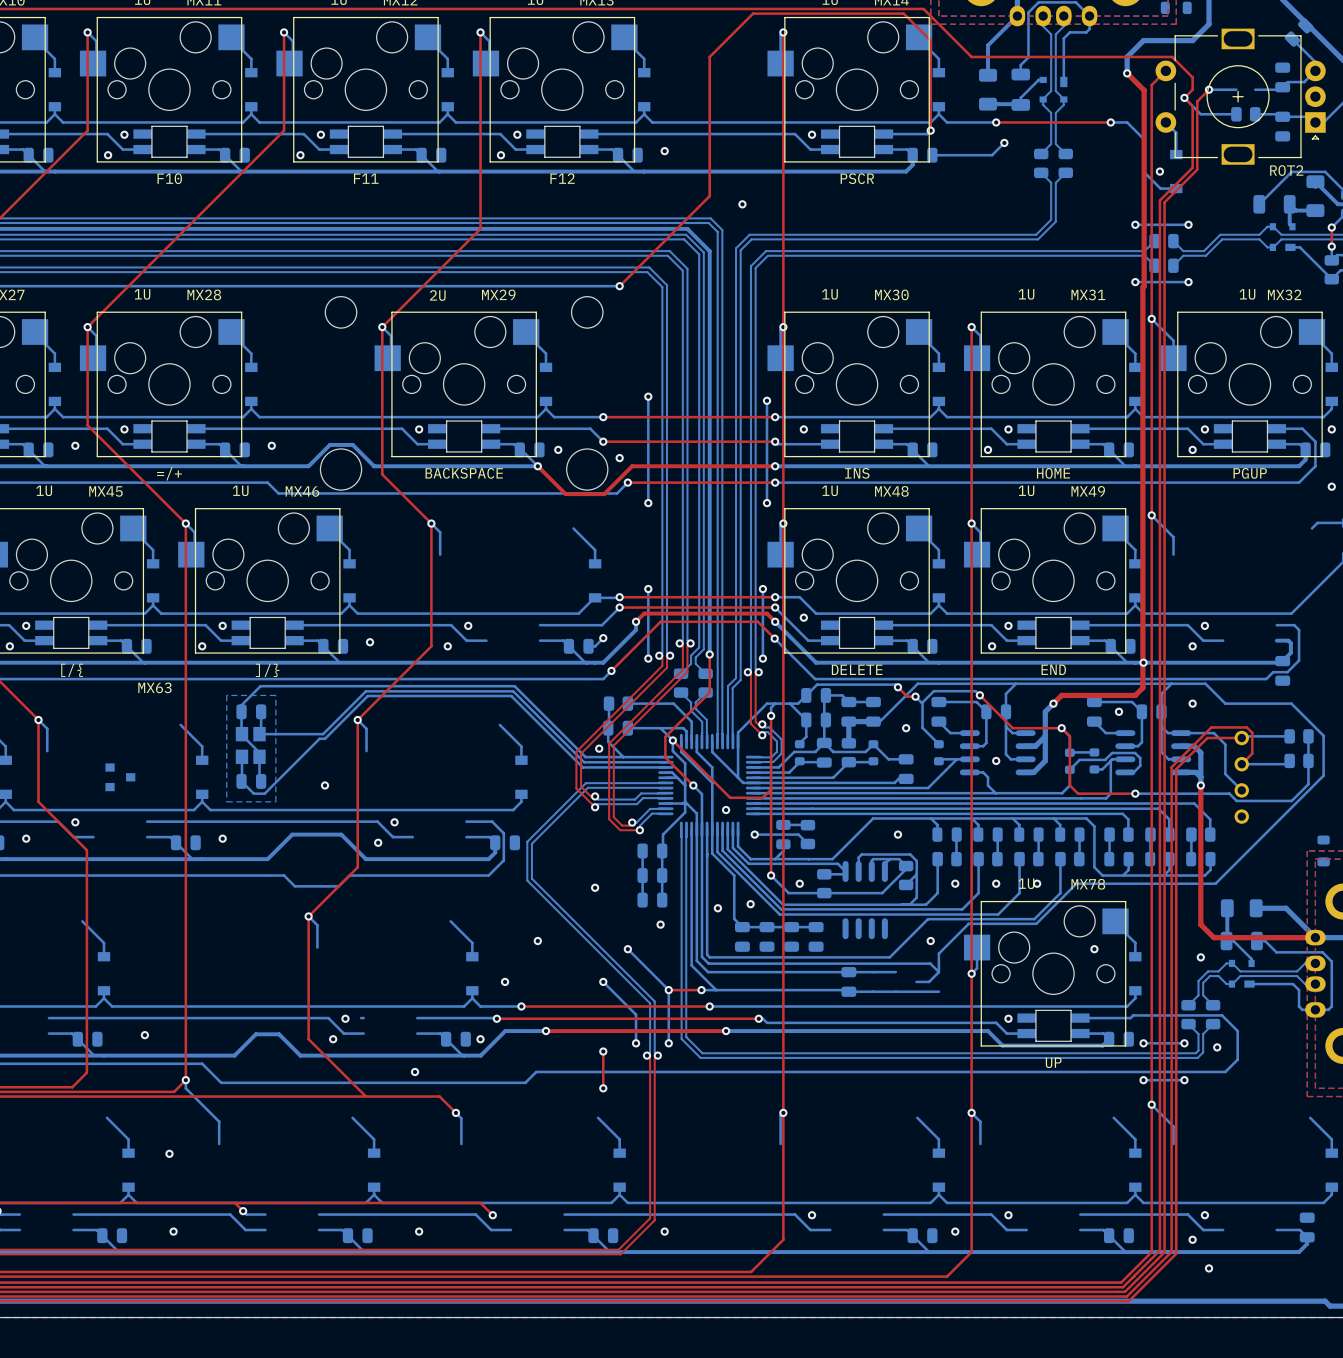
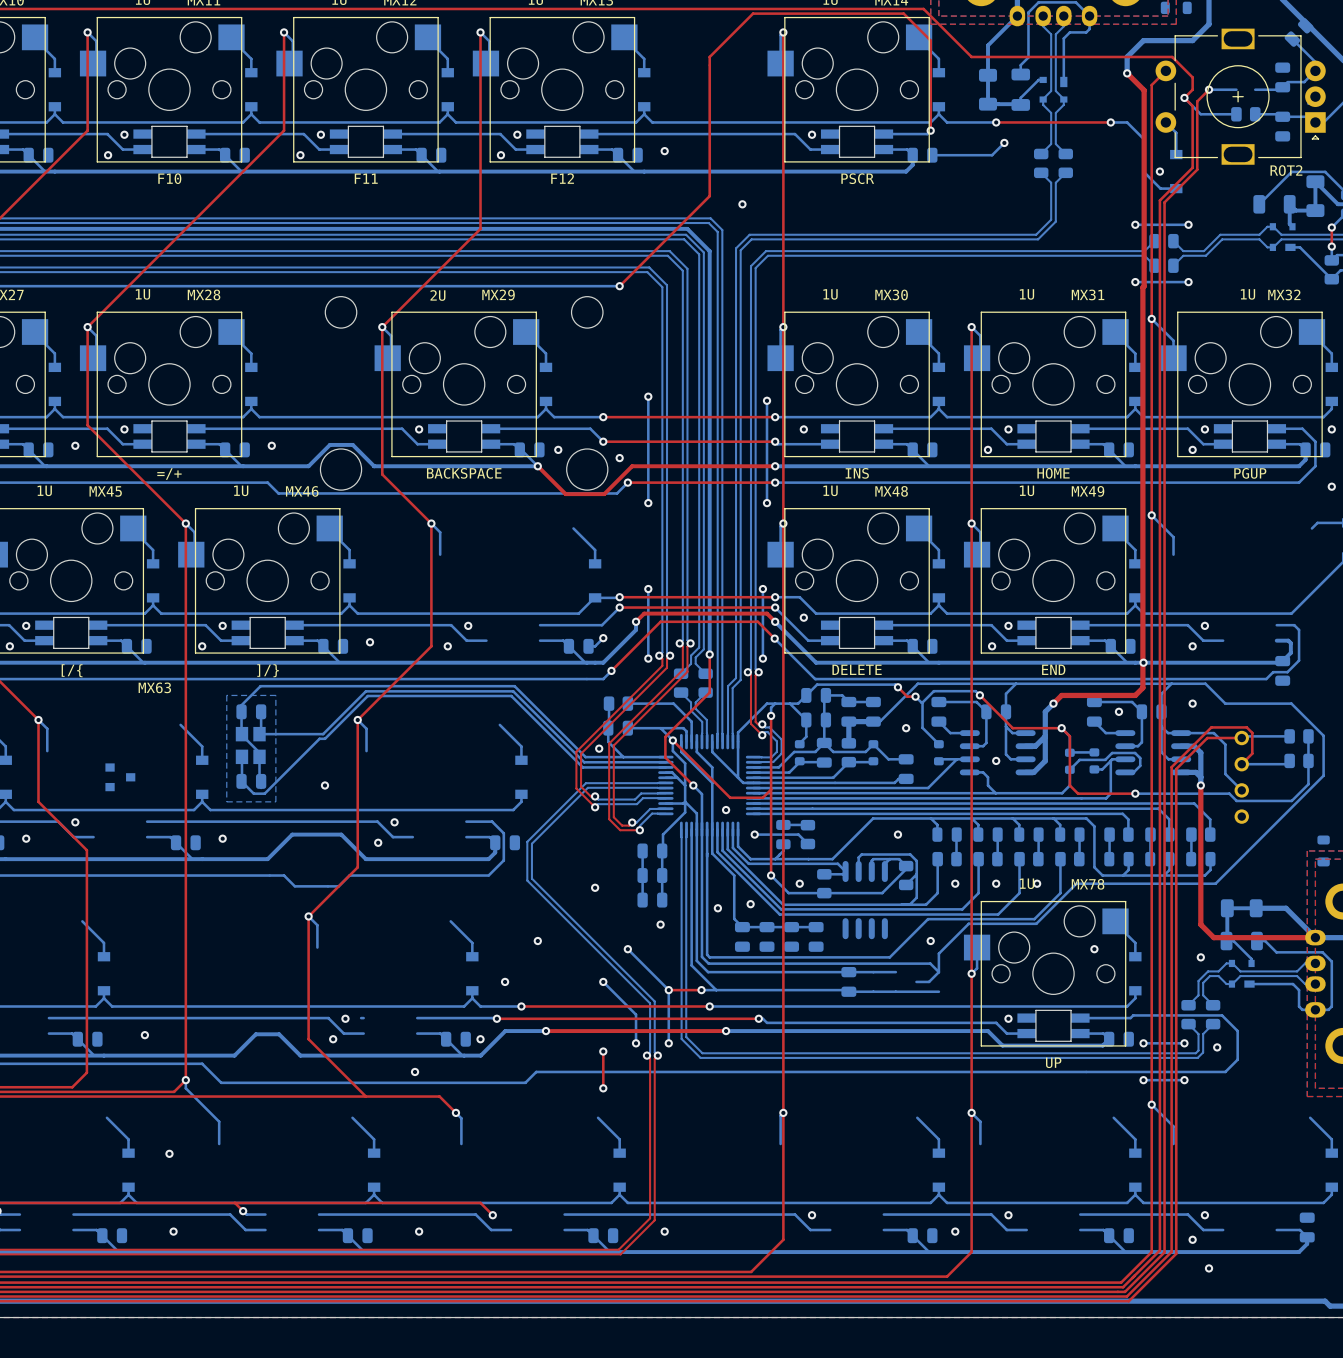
bottom track: none -> (988, 75) (988, 104)
bottom track: none -> (1315, 187) (1315, 210)
bottom track: none -> (1227, 908) (1256, 908)

